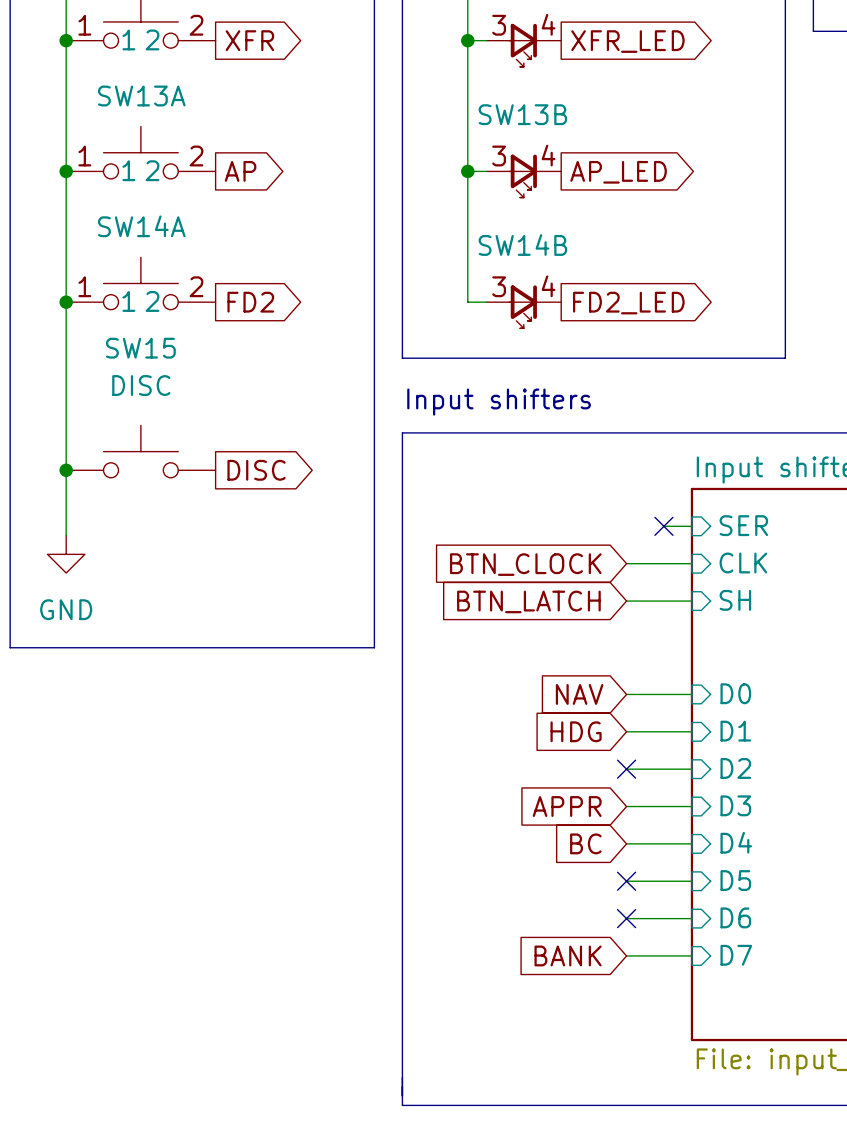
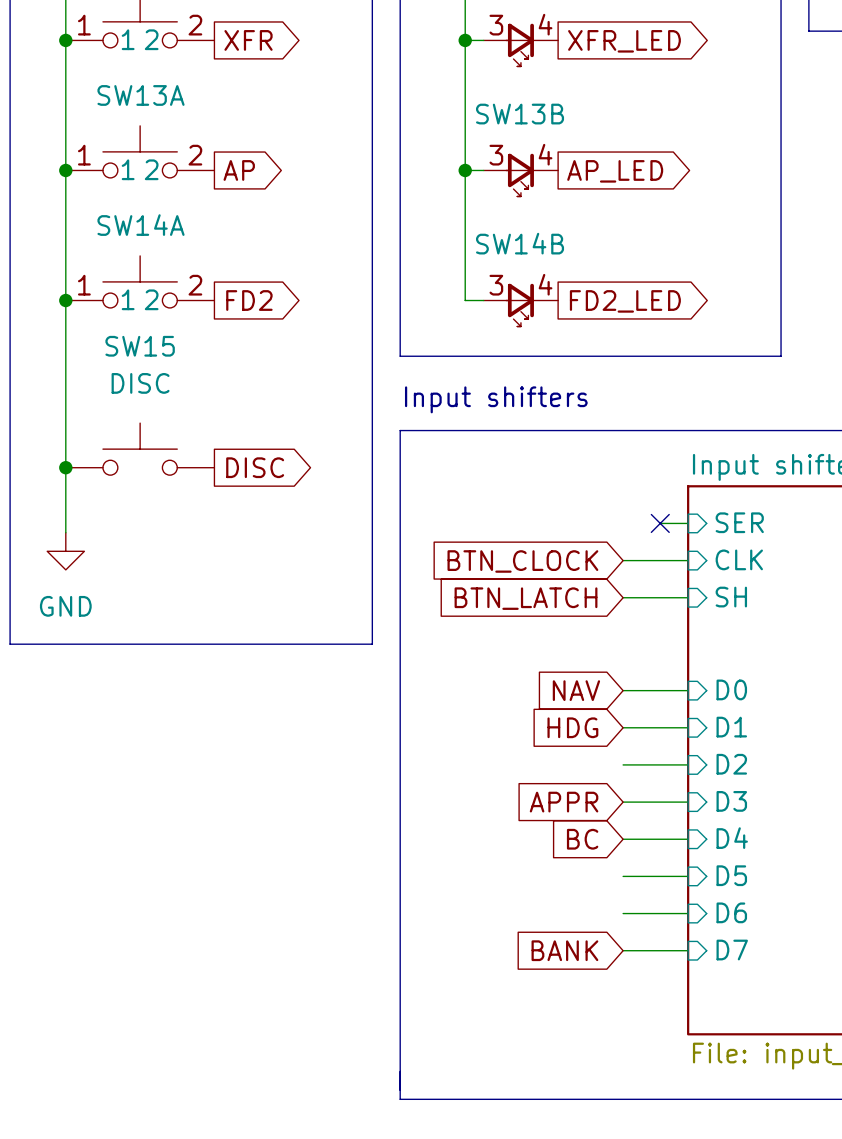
no-connect mark: (626, 769) -> none
no-connect mark: (626, 881) -> none
no-connect mark: (626, 918) -> none

